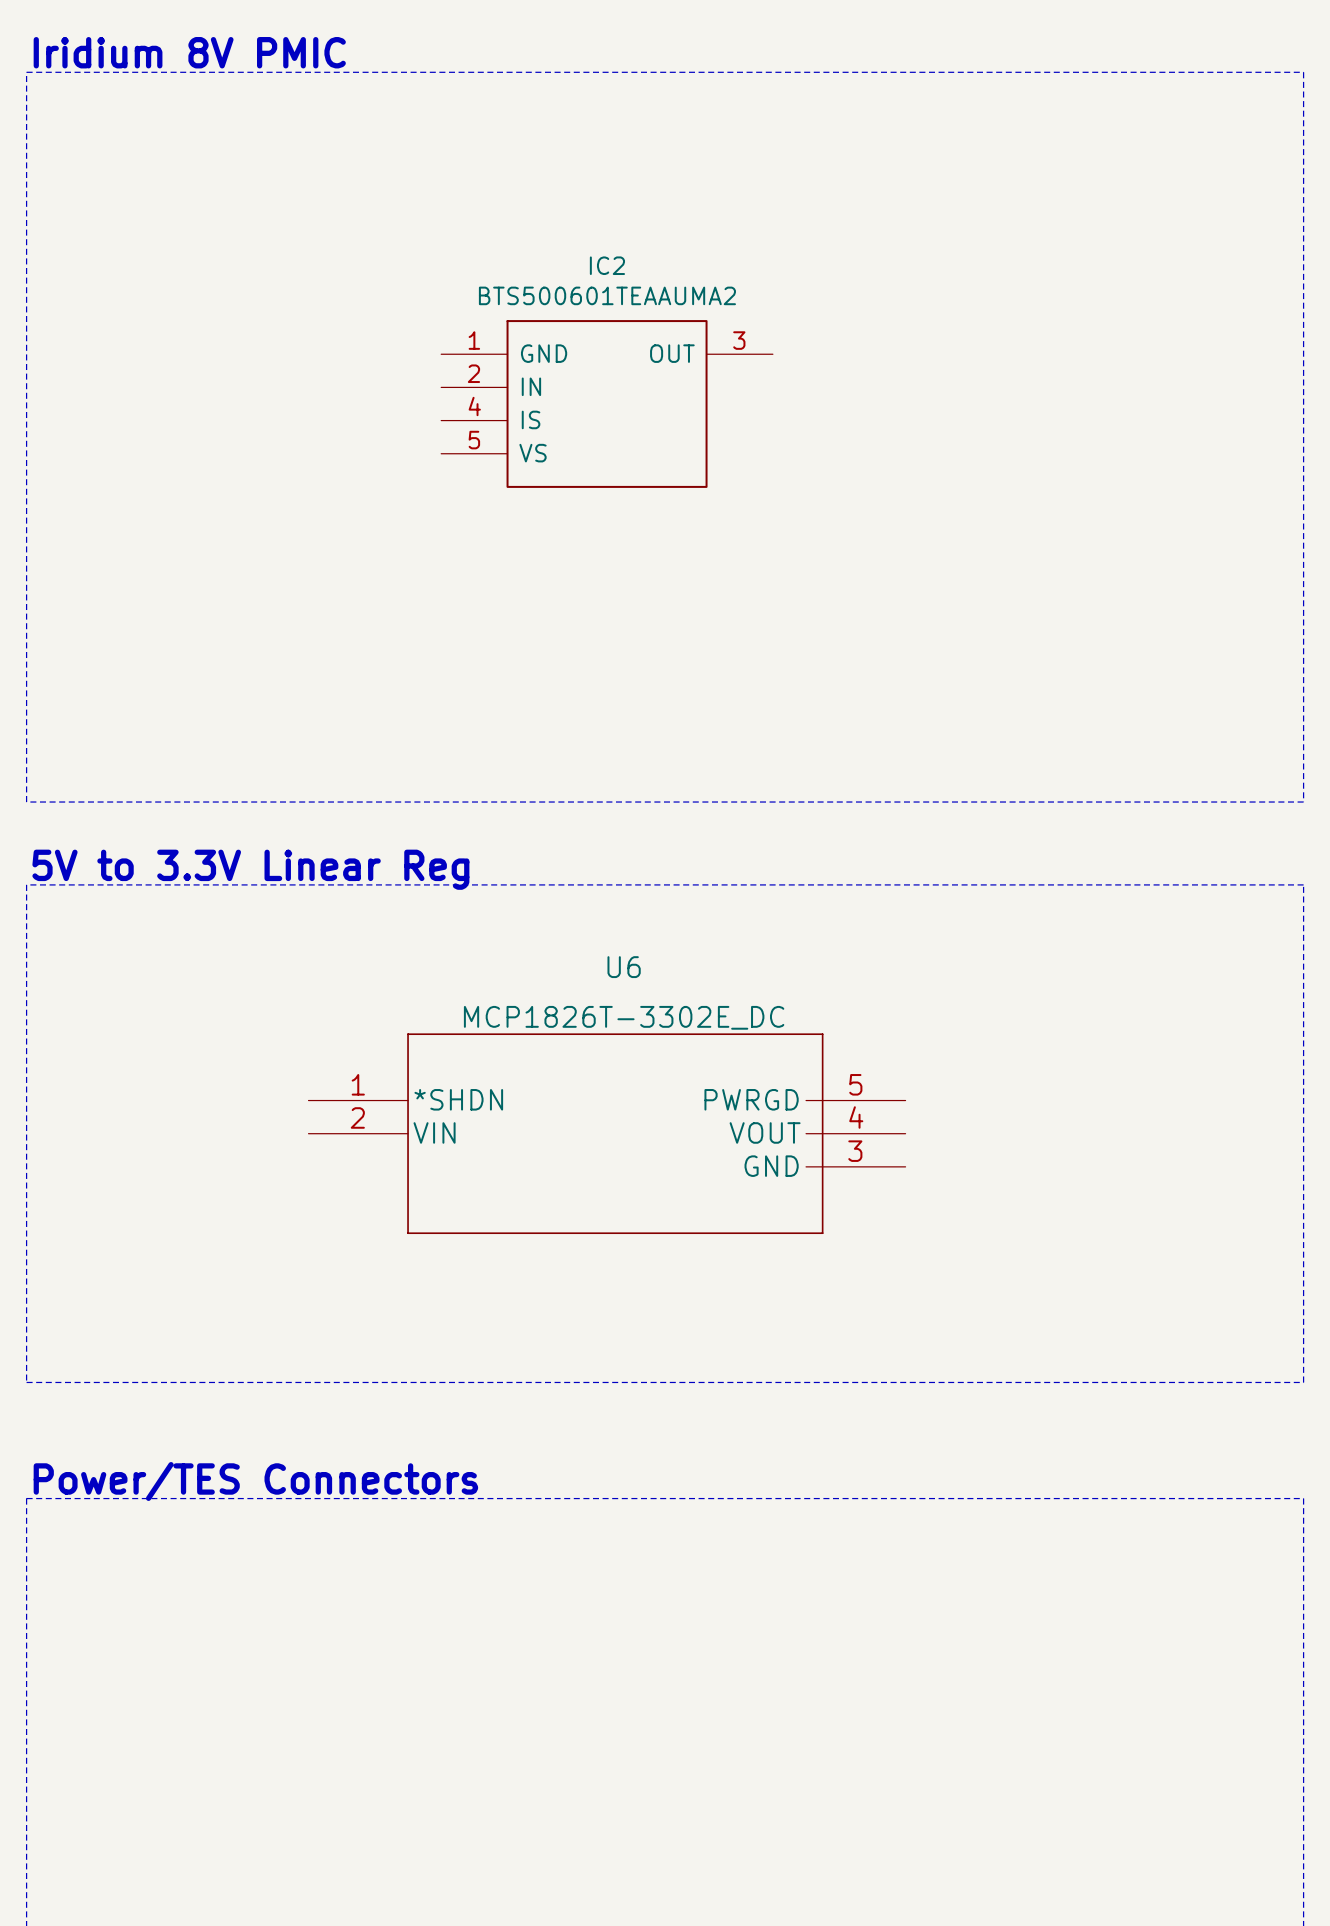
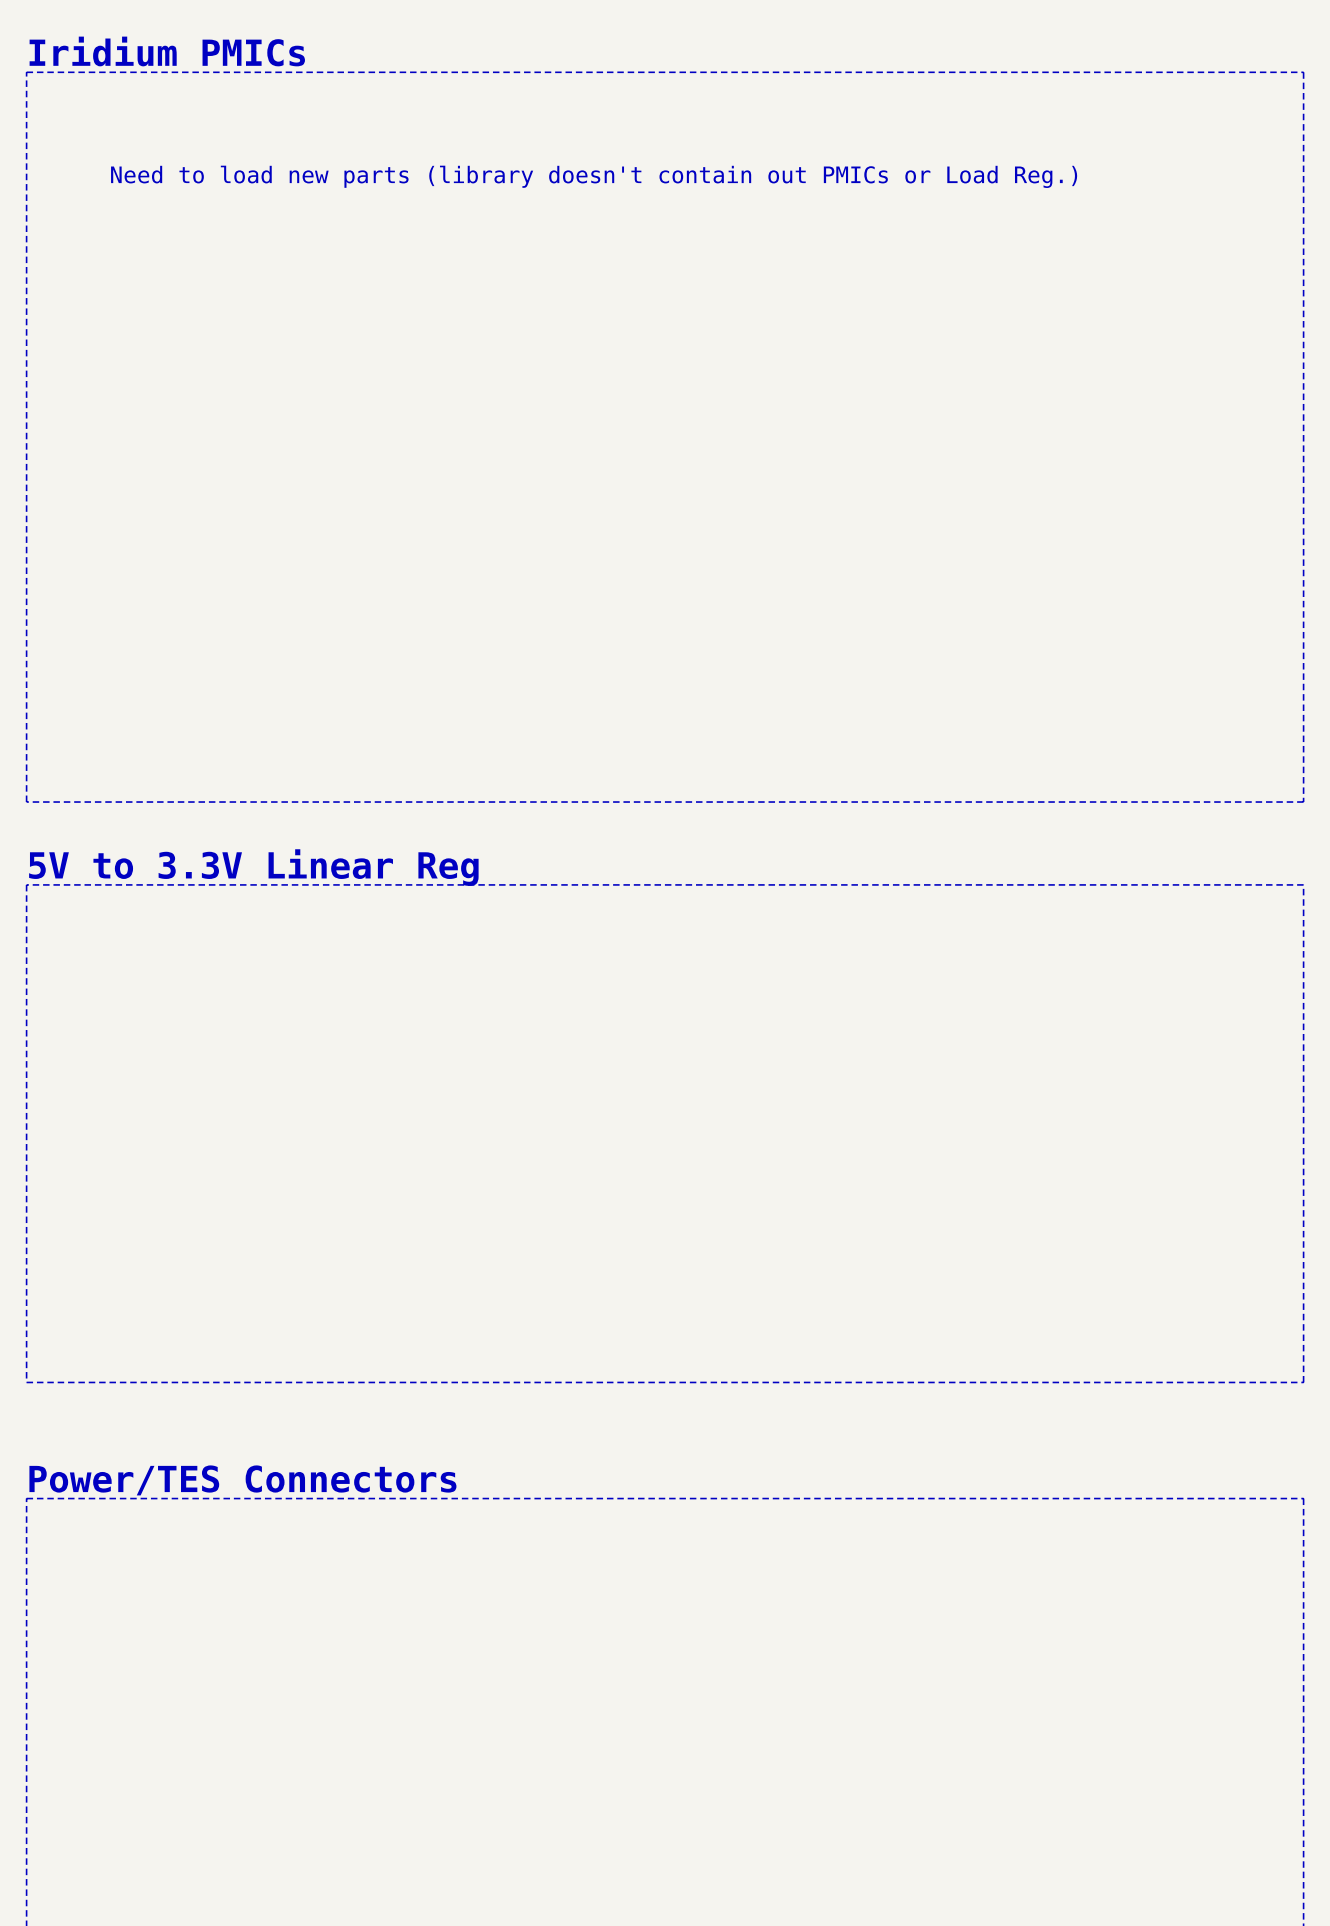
text: Iridium 8V PMIC (189, 52) -> Iridium PMICs (167, 51)
text: none -> Need to load new parts (library doesn't contain out PMICs or Load Reg.) (594, 176)
IC2: BTS500601TEAAUMA2 (607, 403) -> none
U6: MCP1826T-3302E_DC (607, 1133) -> none

